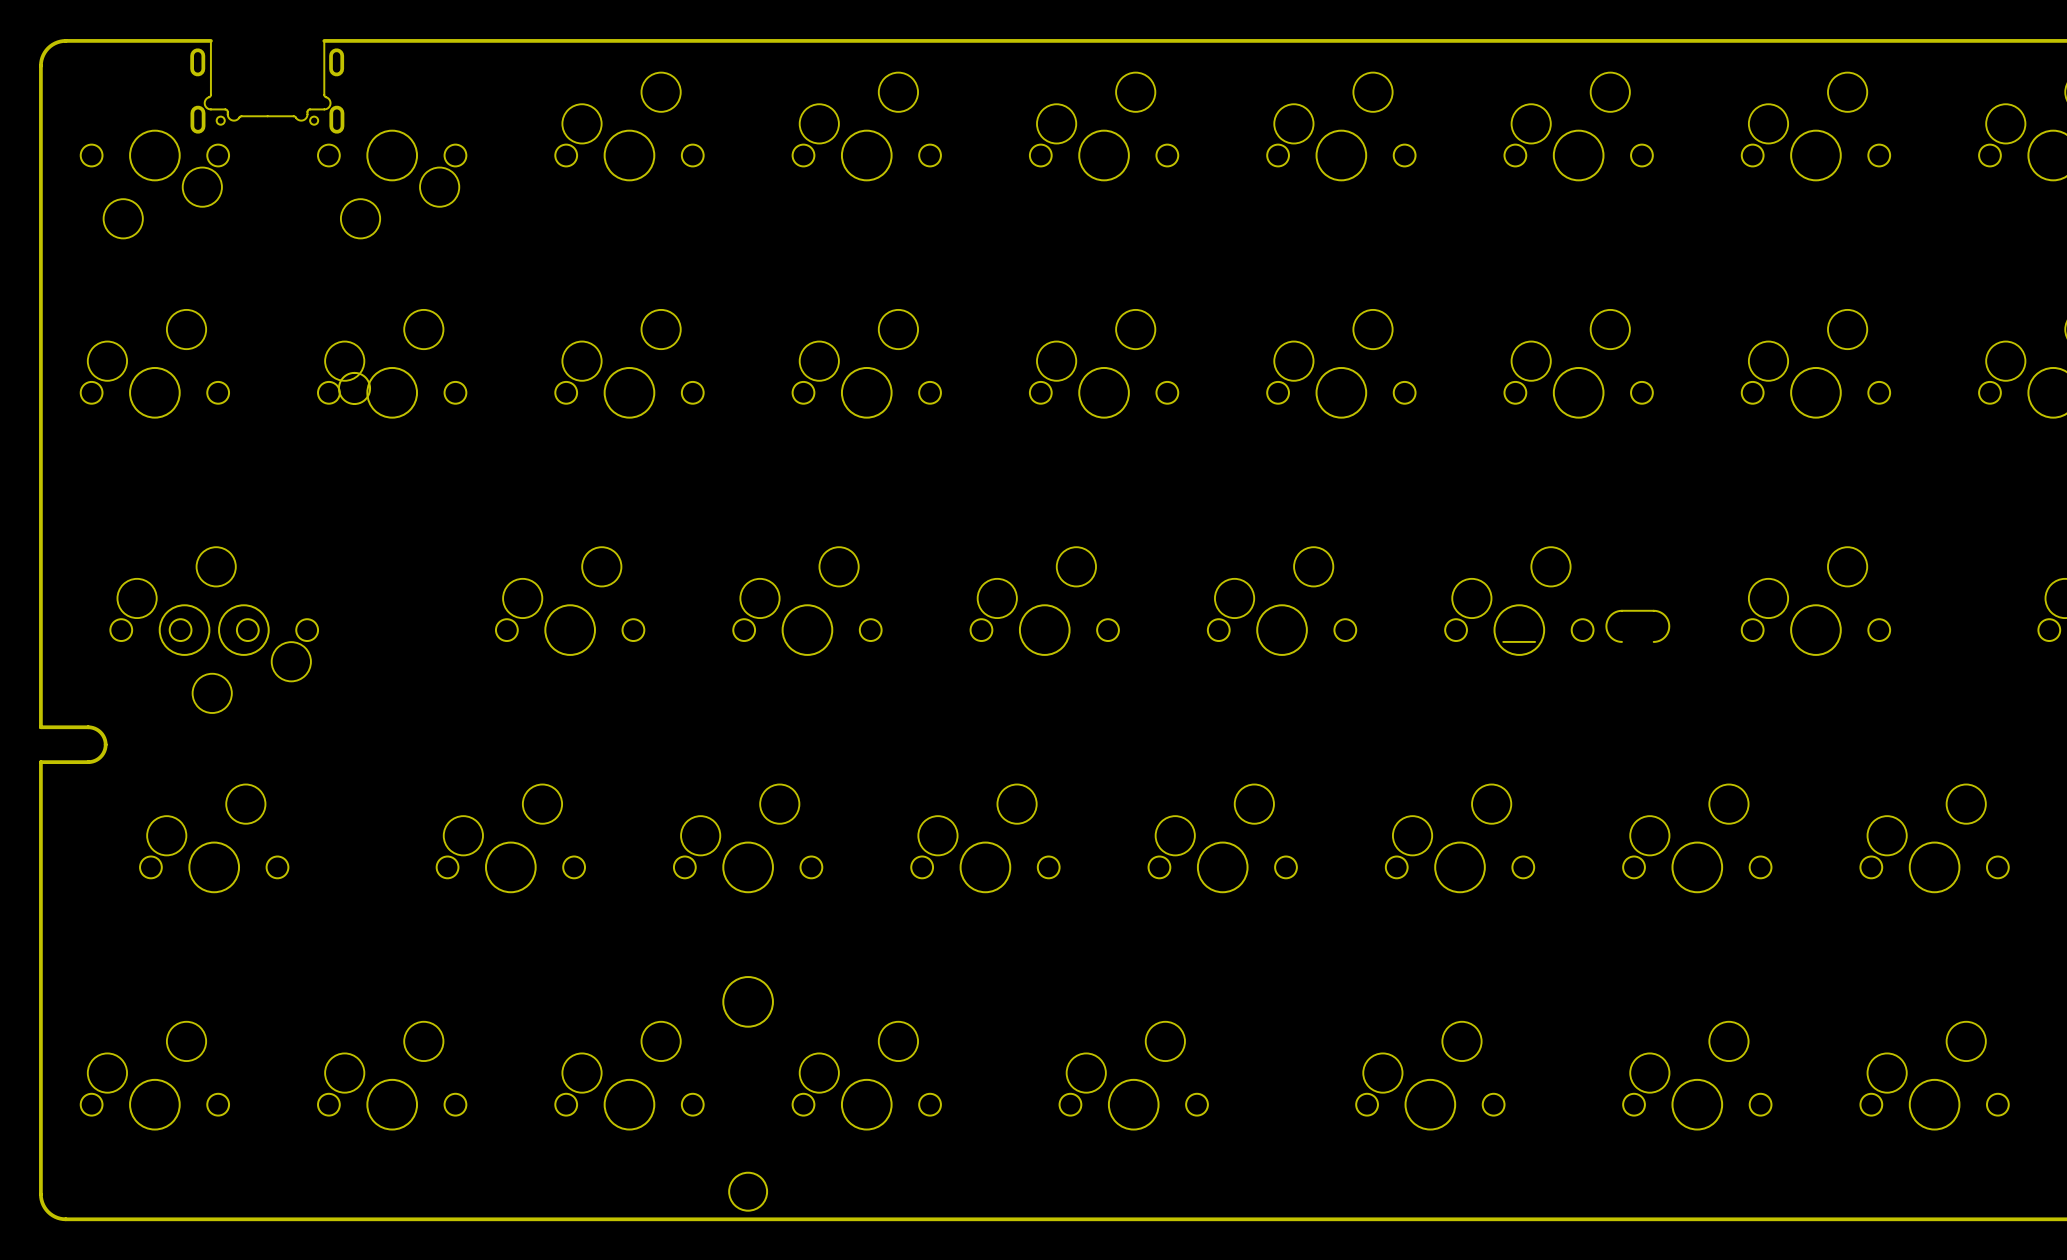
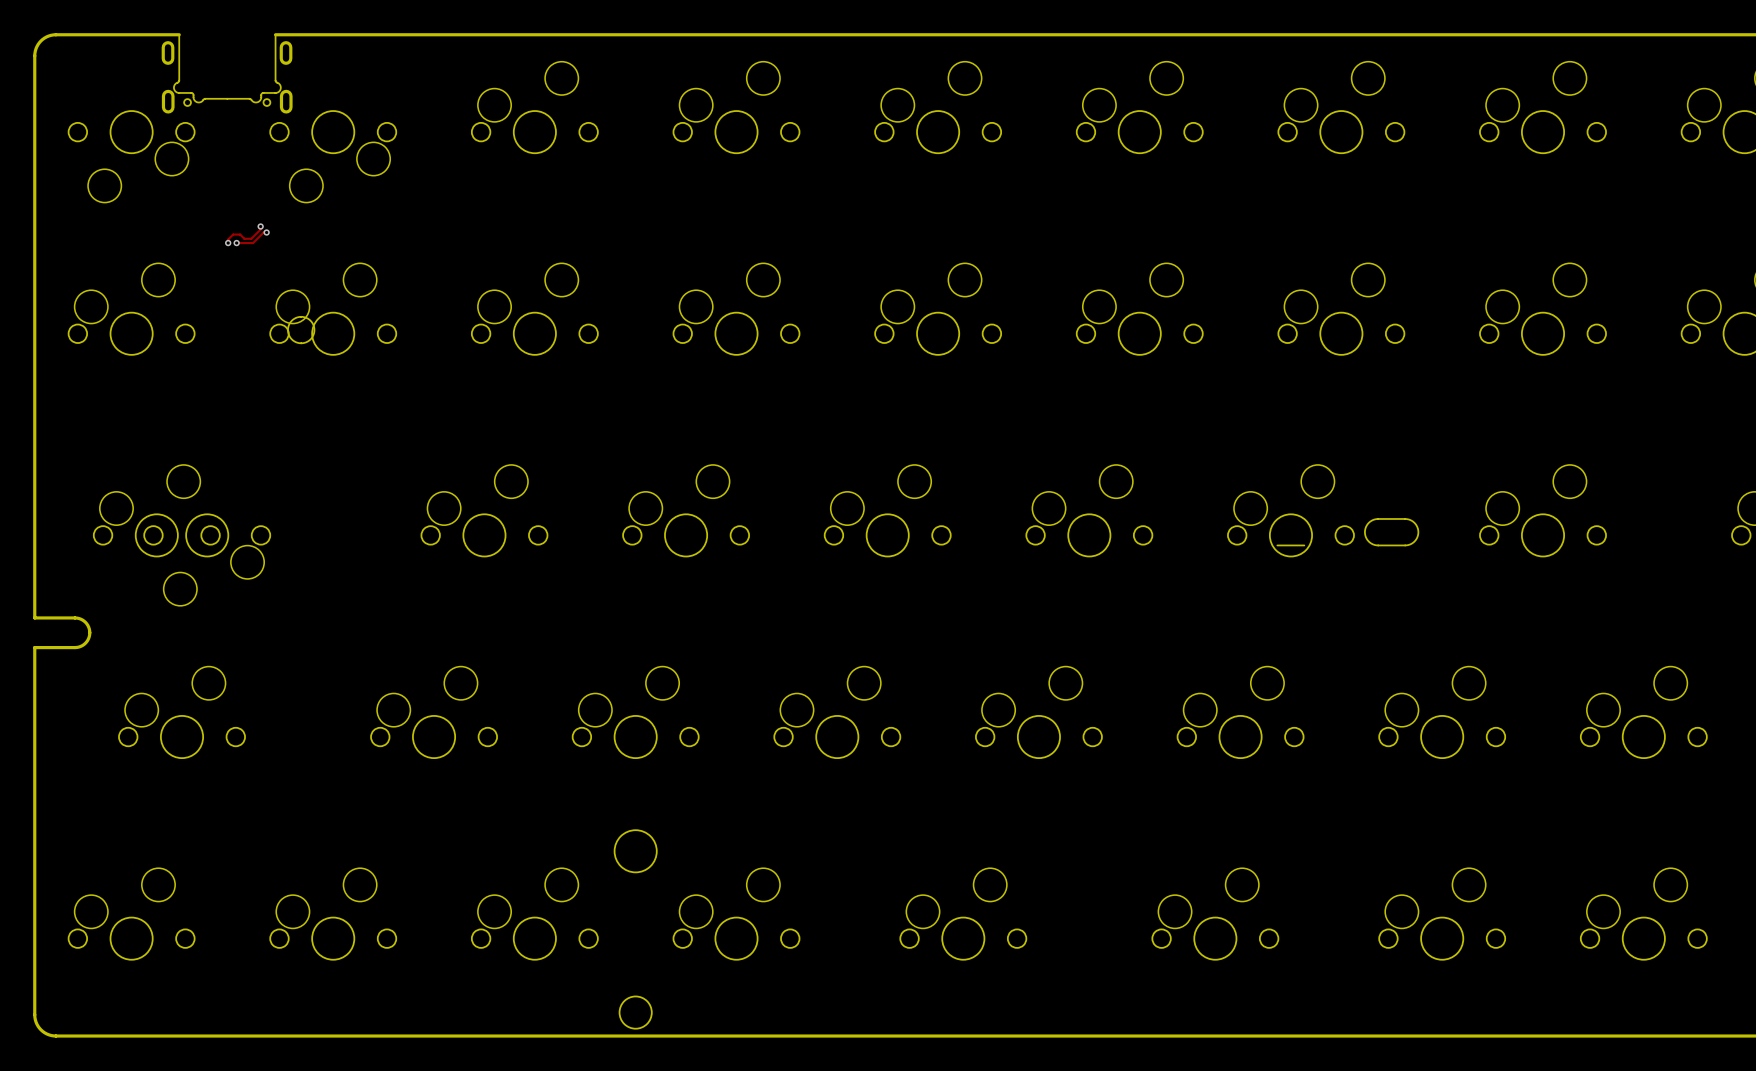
track: none -> (260, 226) (260, 229) (251, 238) (244, 238) (240, 234) (233, 234) (228, 239) (228, 243)
via: none -> (260, 226)
track: none -> (266, 232) (263, 232) (253, 243) (236, 243)
via: none -> (266, 232)
via: none -> (228, 243)
via: none -> (236, 243)
board edge: none -> (1378, 545) (1405, 545)

